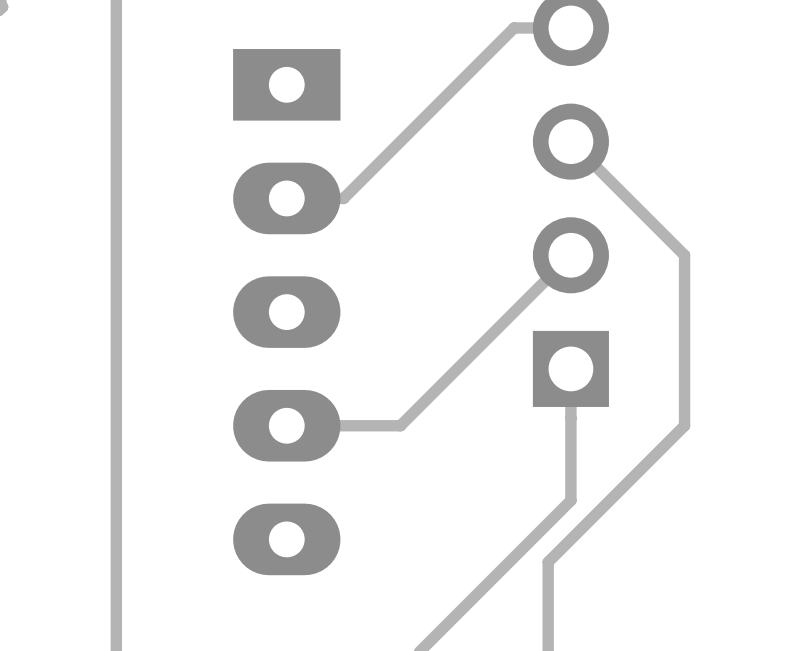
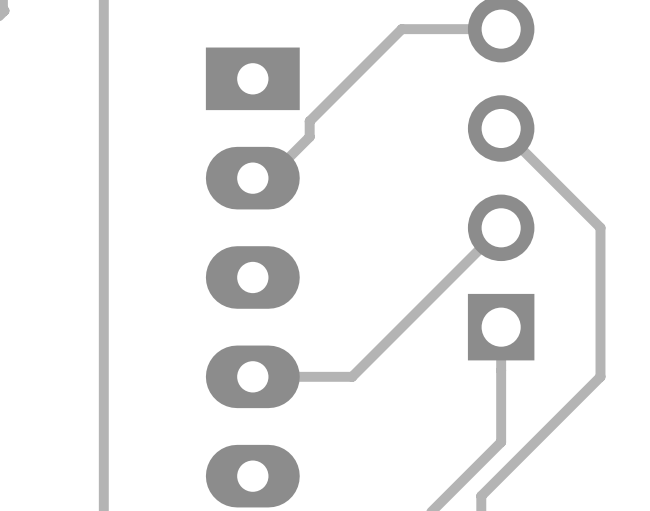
track: (514, 27) (343, 198) (304, 198) -> (451, 29) (401, 29) (309, 121) (309, 136) (268, 178)

